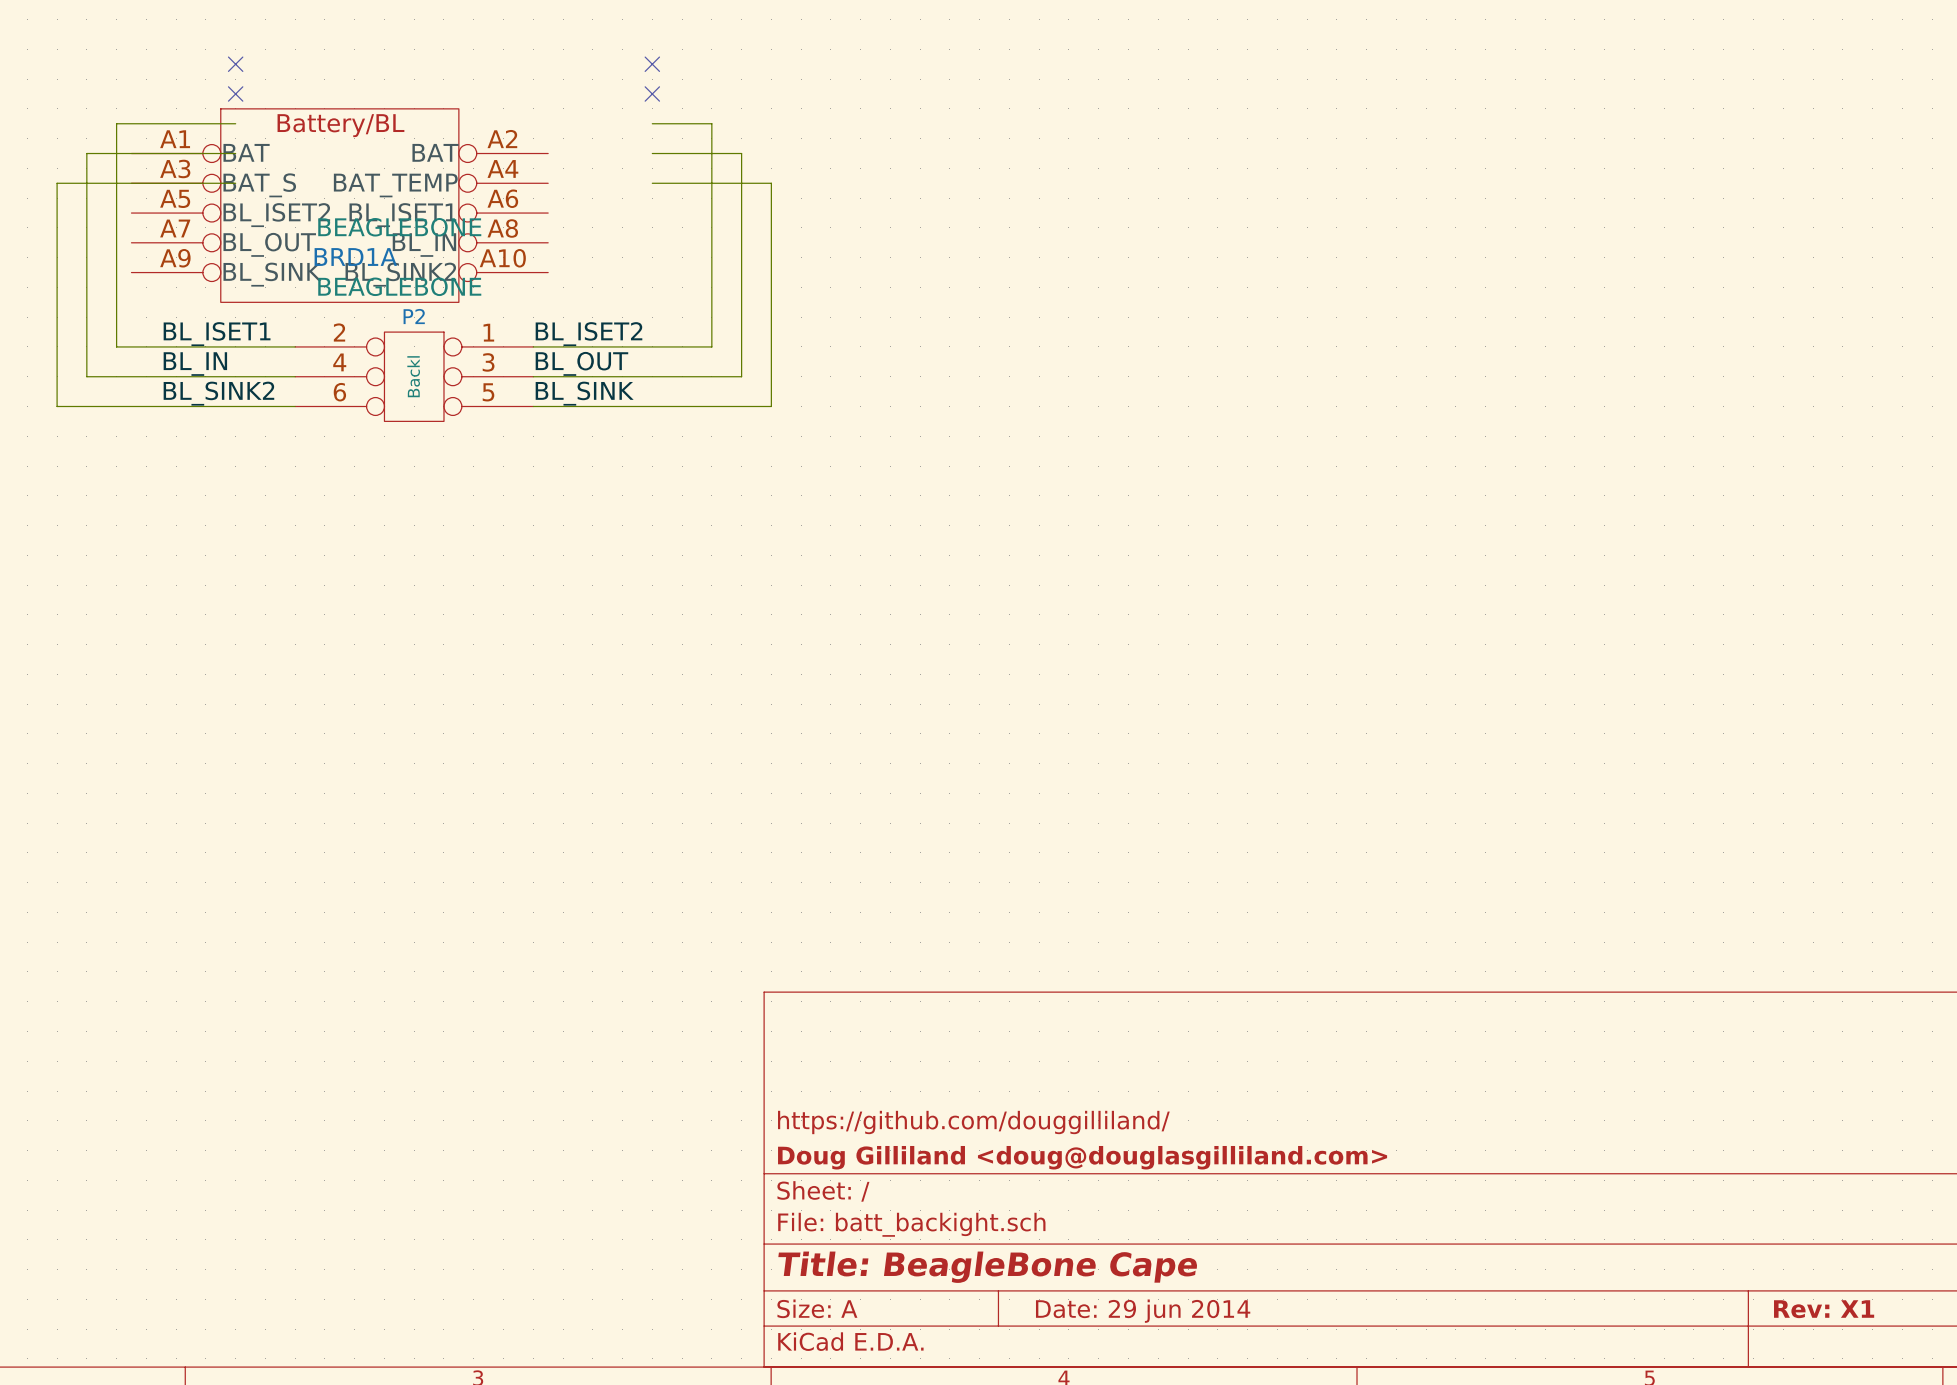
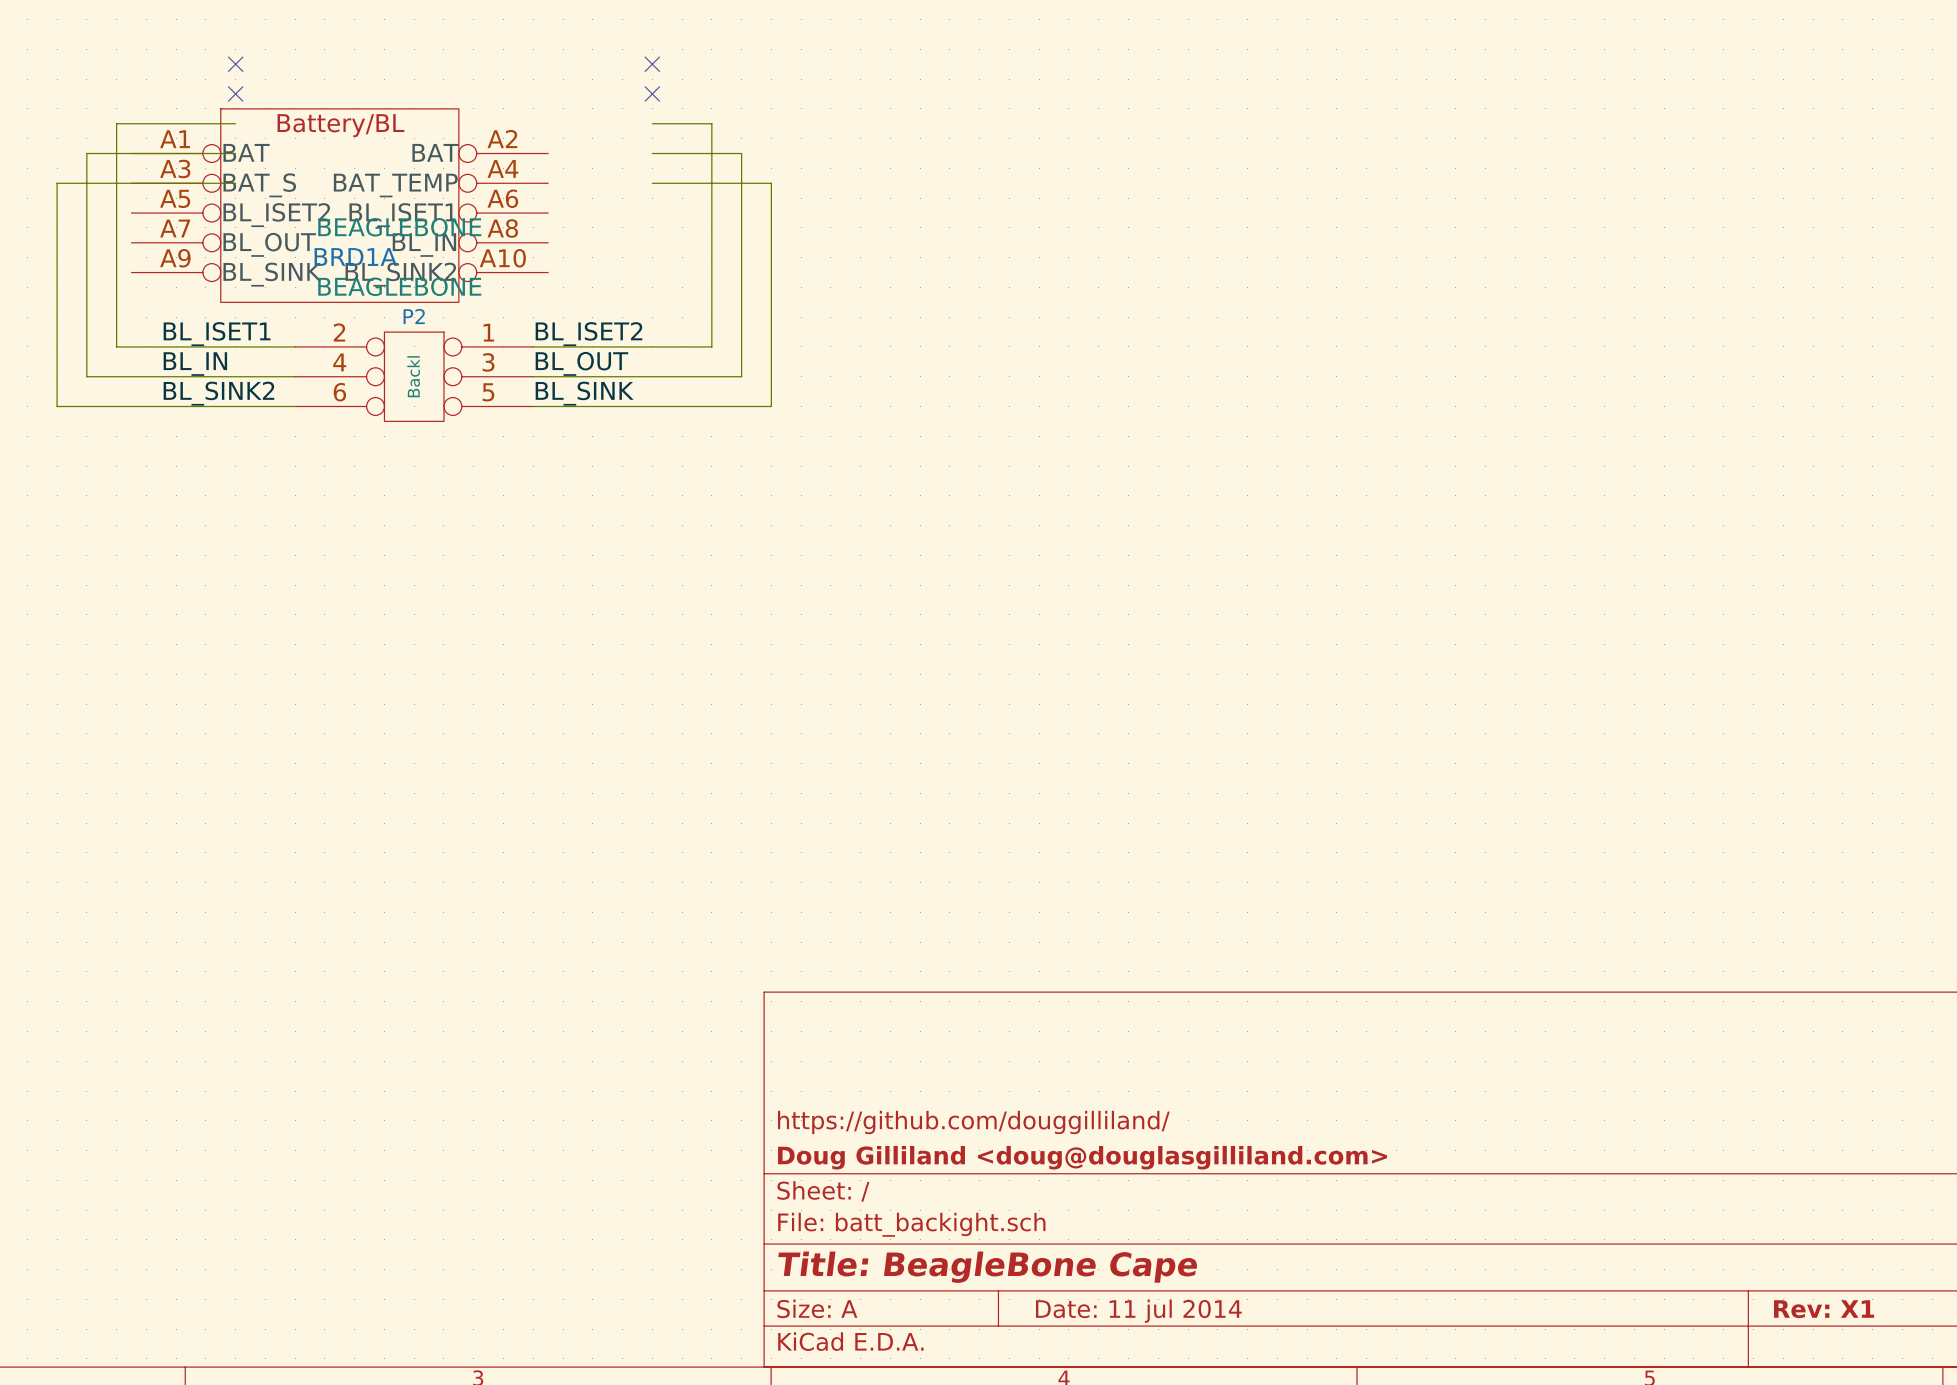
title block: Date: 29 jun 2014 (1143, 1311) -> Date: 11 jul 2014 (1138, 1311)

